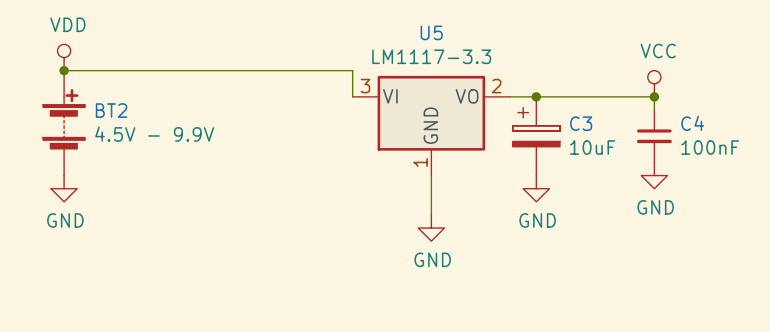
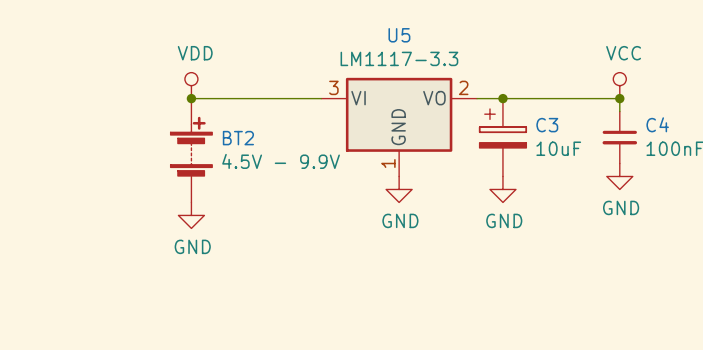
power symbol position: VDD (64, 57) -> VDD (191, 85)
wire: (64, 70) (352, 70) (352, 96) -> (191, 98) (321, 98)
junction: (64, 70) -> none
junction: none -> (191, 98)
BT2 position: (64, 123) -> (191, 150)
wire: (431, 175) (431, 214) -> none
power symbol: GND (64, 188) -> none
power symbol: none -> GND (191, 215)
power symbol position: GND (431, 228) -> GND (399, 189)

